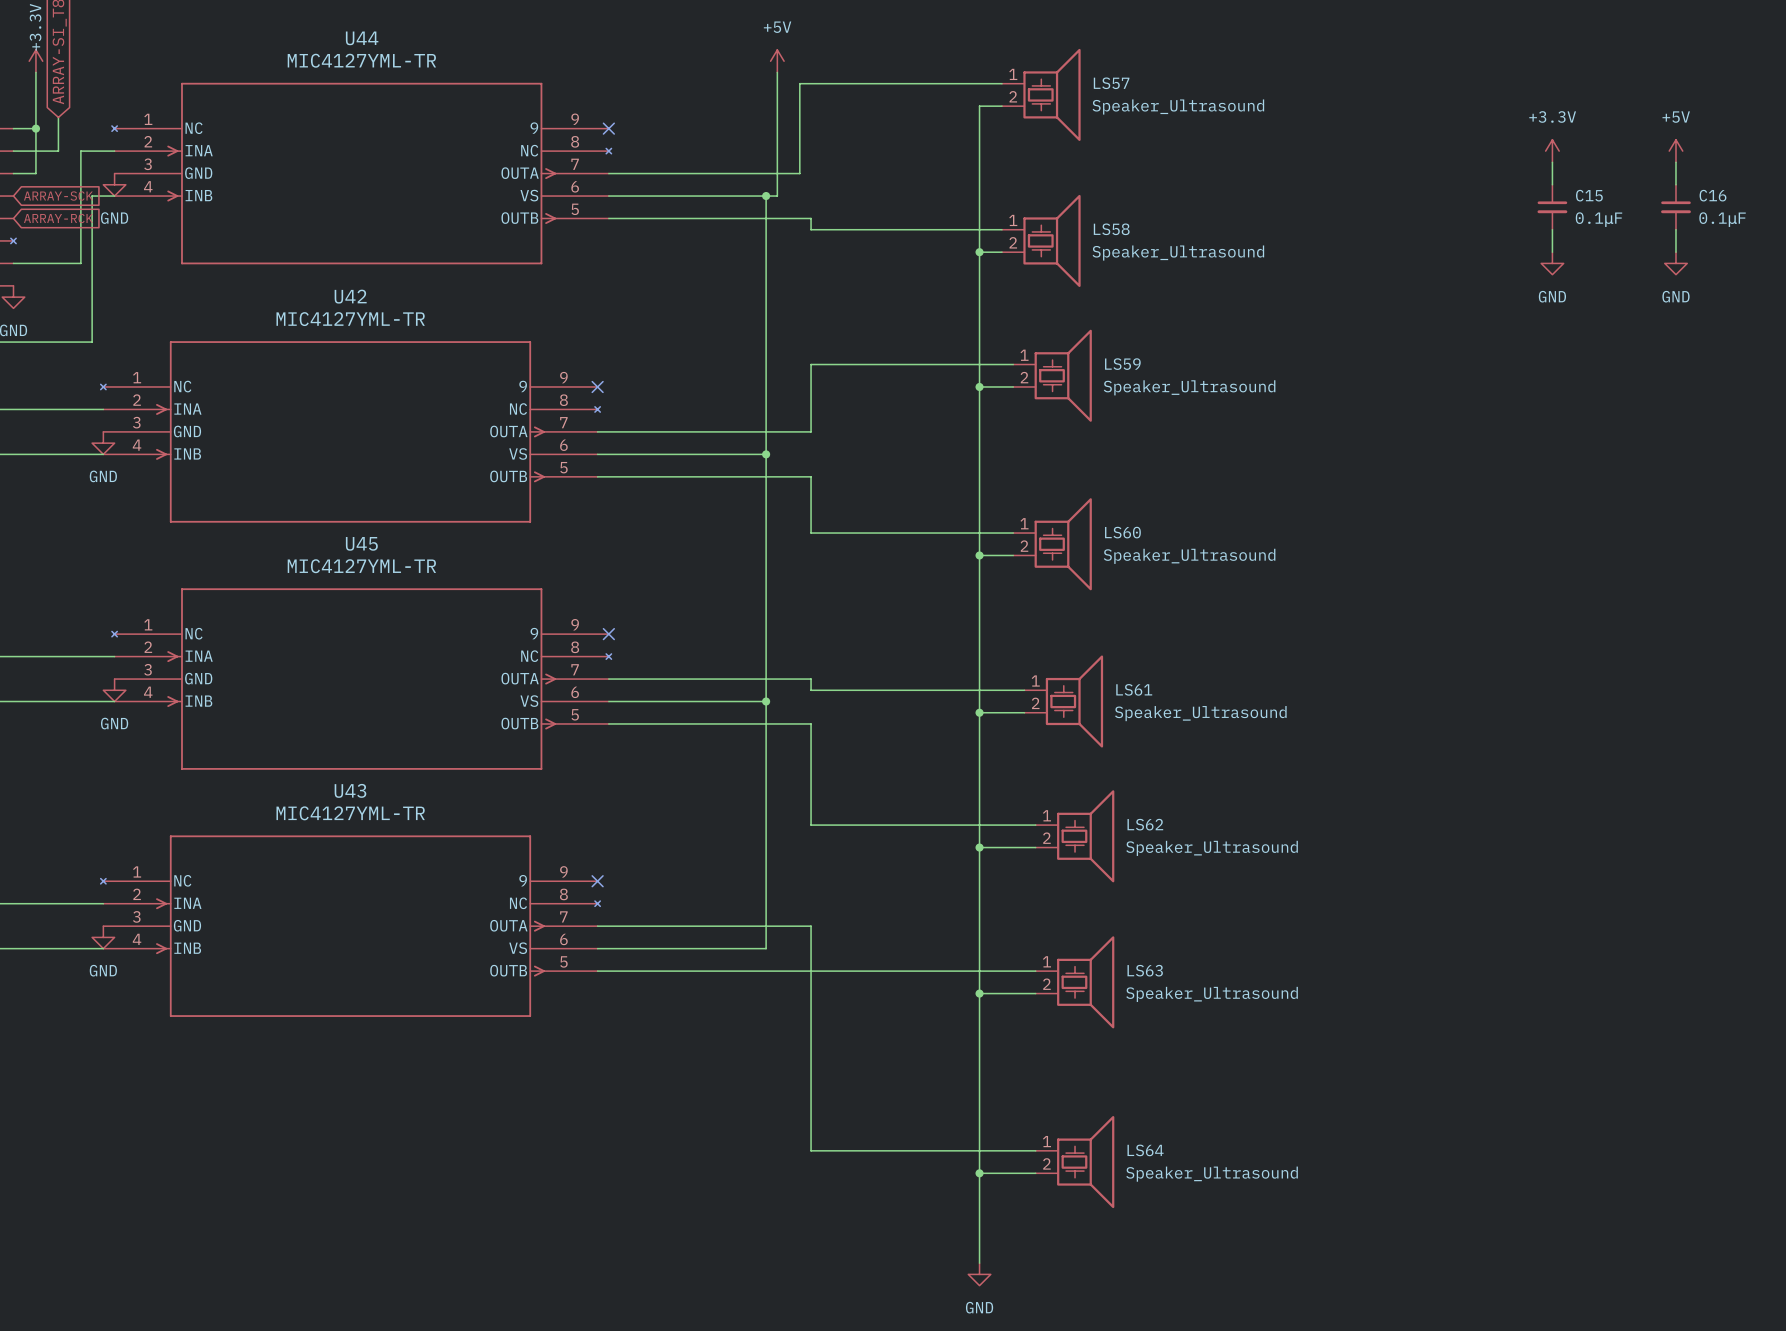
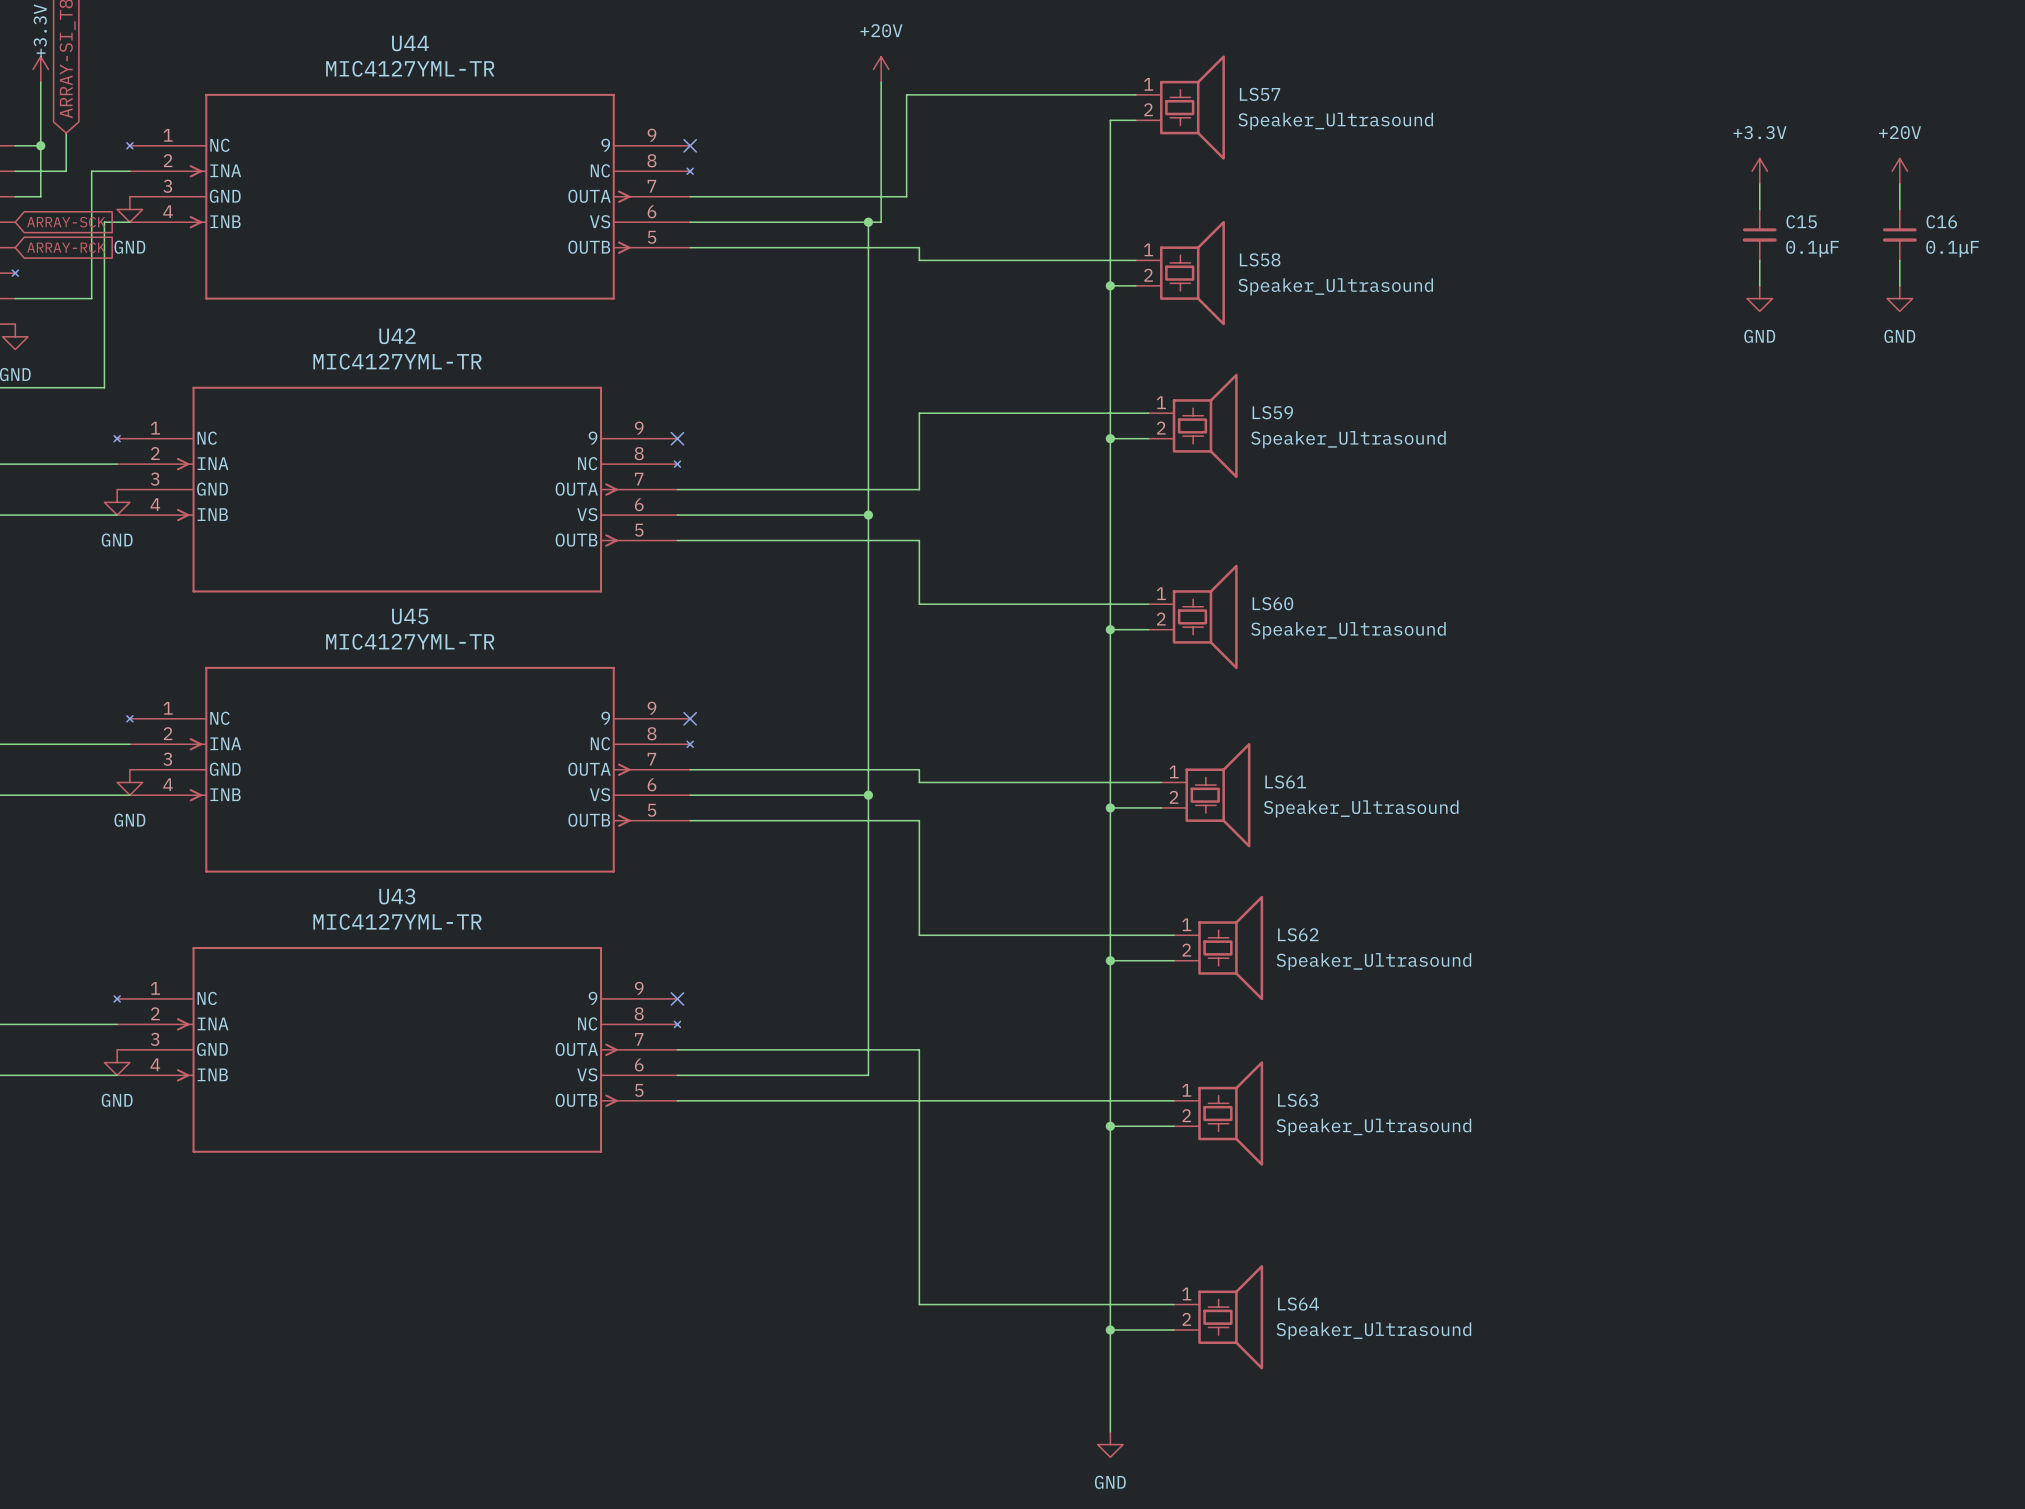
power symbol: +5V (777, 61) -> +20V (881, 69)
power symbol: +5V (1675, 151) -> +20V (1899, 171)

